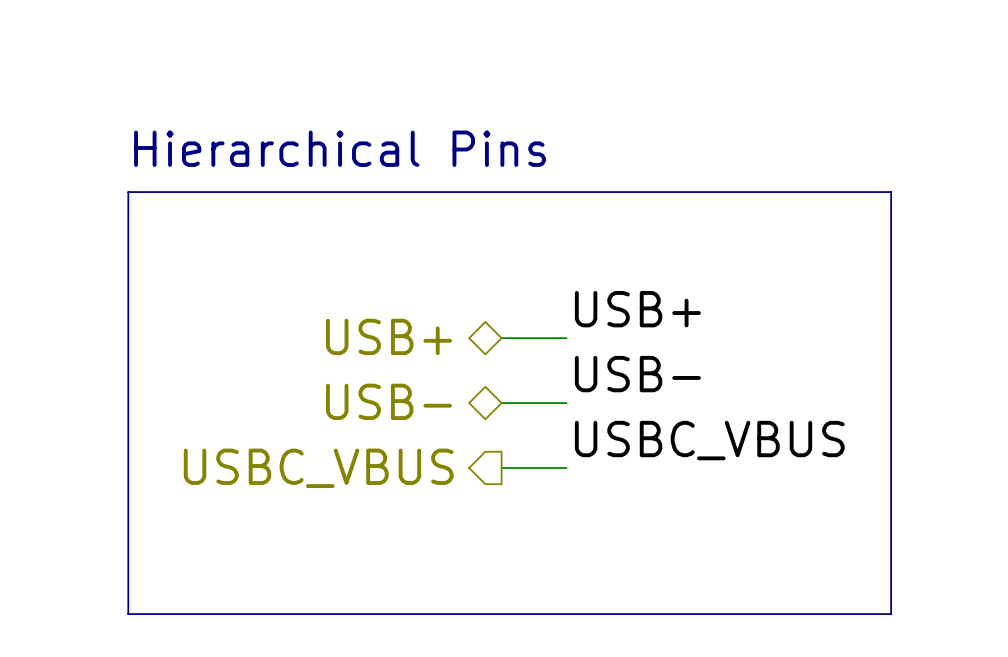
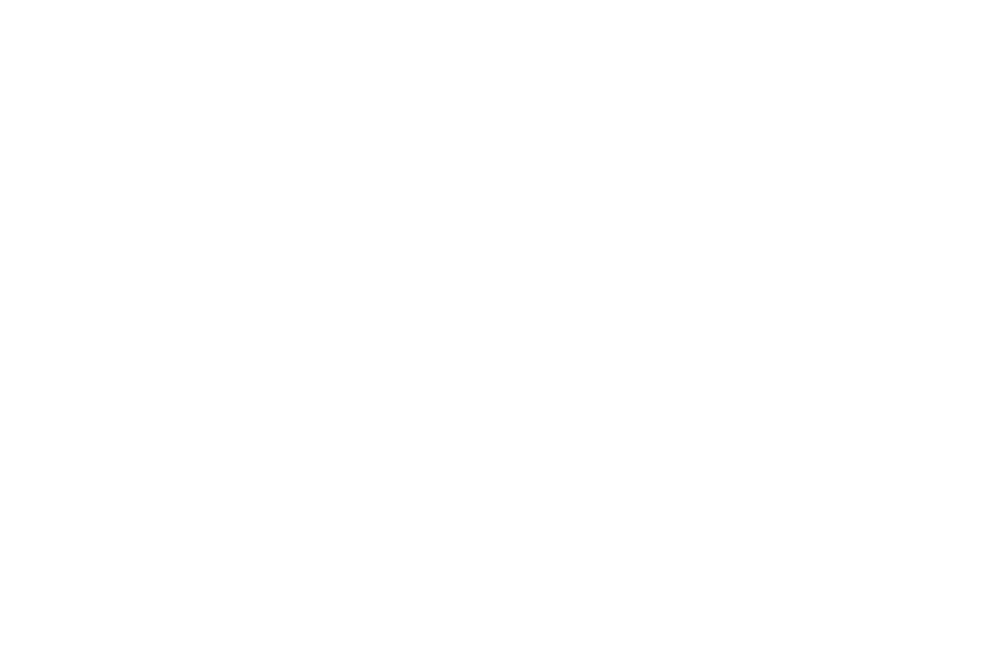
text: Hierarchical Pins (340, 148) -> none
line: (128, 192) (891, 192) (891, 614) (128, 614) (128, 192) -> none
label: USB+ (637, 309) -> none
hierarchical label: USB+ (389, 336) -> none
wire: (501, 338) (566, 338) -> none
label: USB- (637, 374) -> none
hierarchical label: USB- (389, 401) -> none
wire: (501, 403) (566, 403) -> none
label: USBC_VBUS (709, 440) -> none
wire: (501, 467) (566, 467) -> none
hierarchical label: USBC_VBUS (318, 468) -> none

